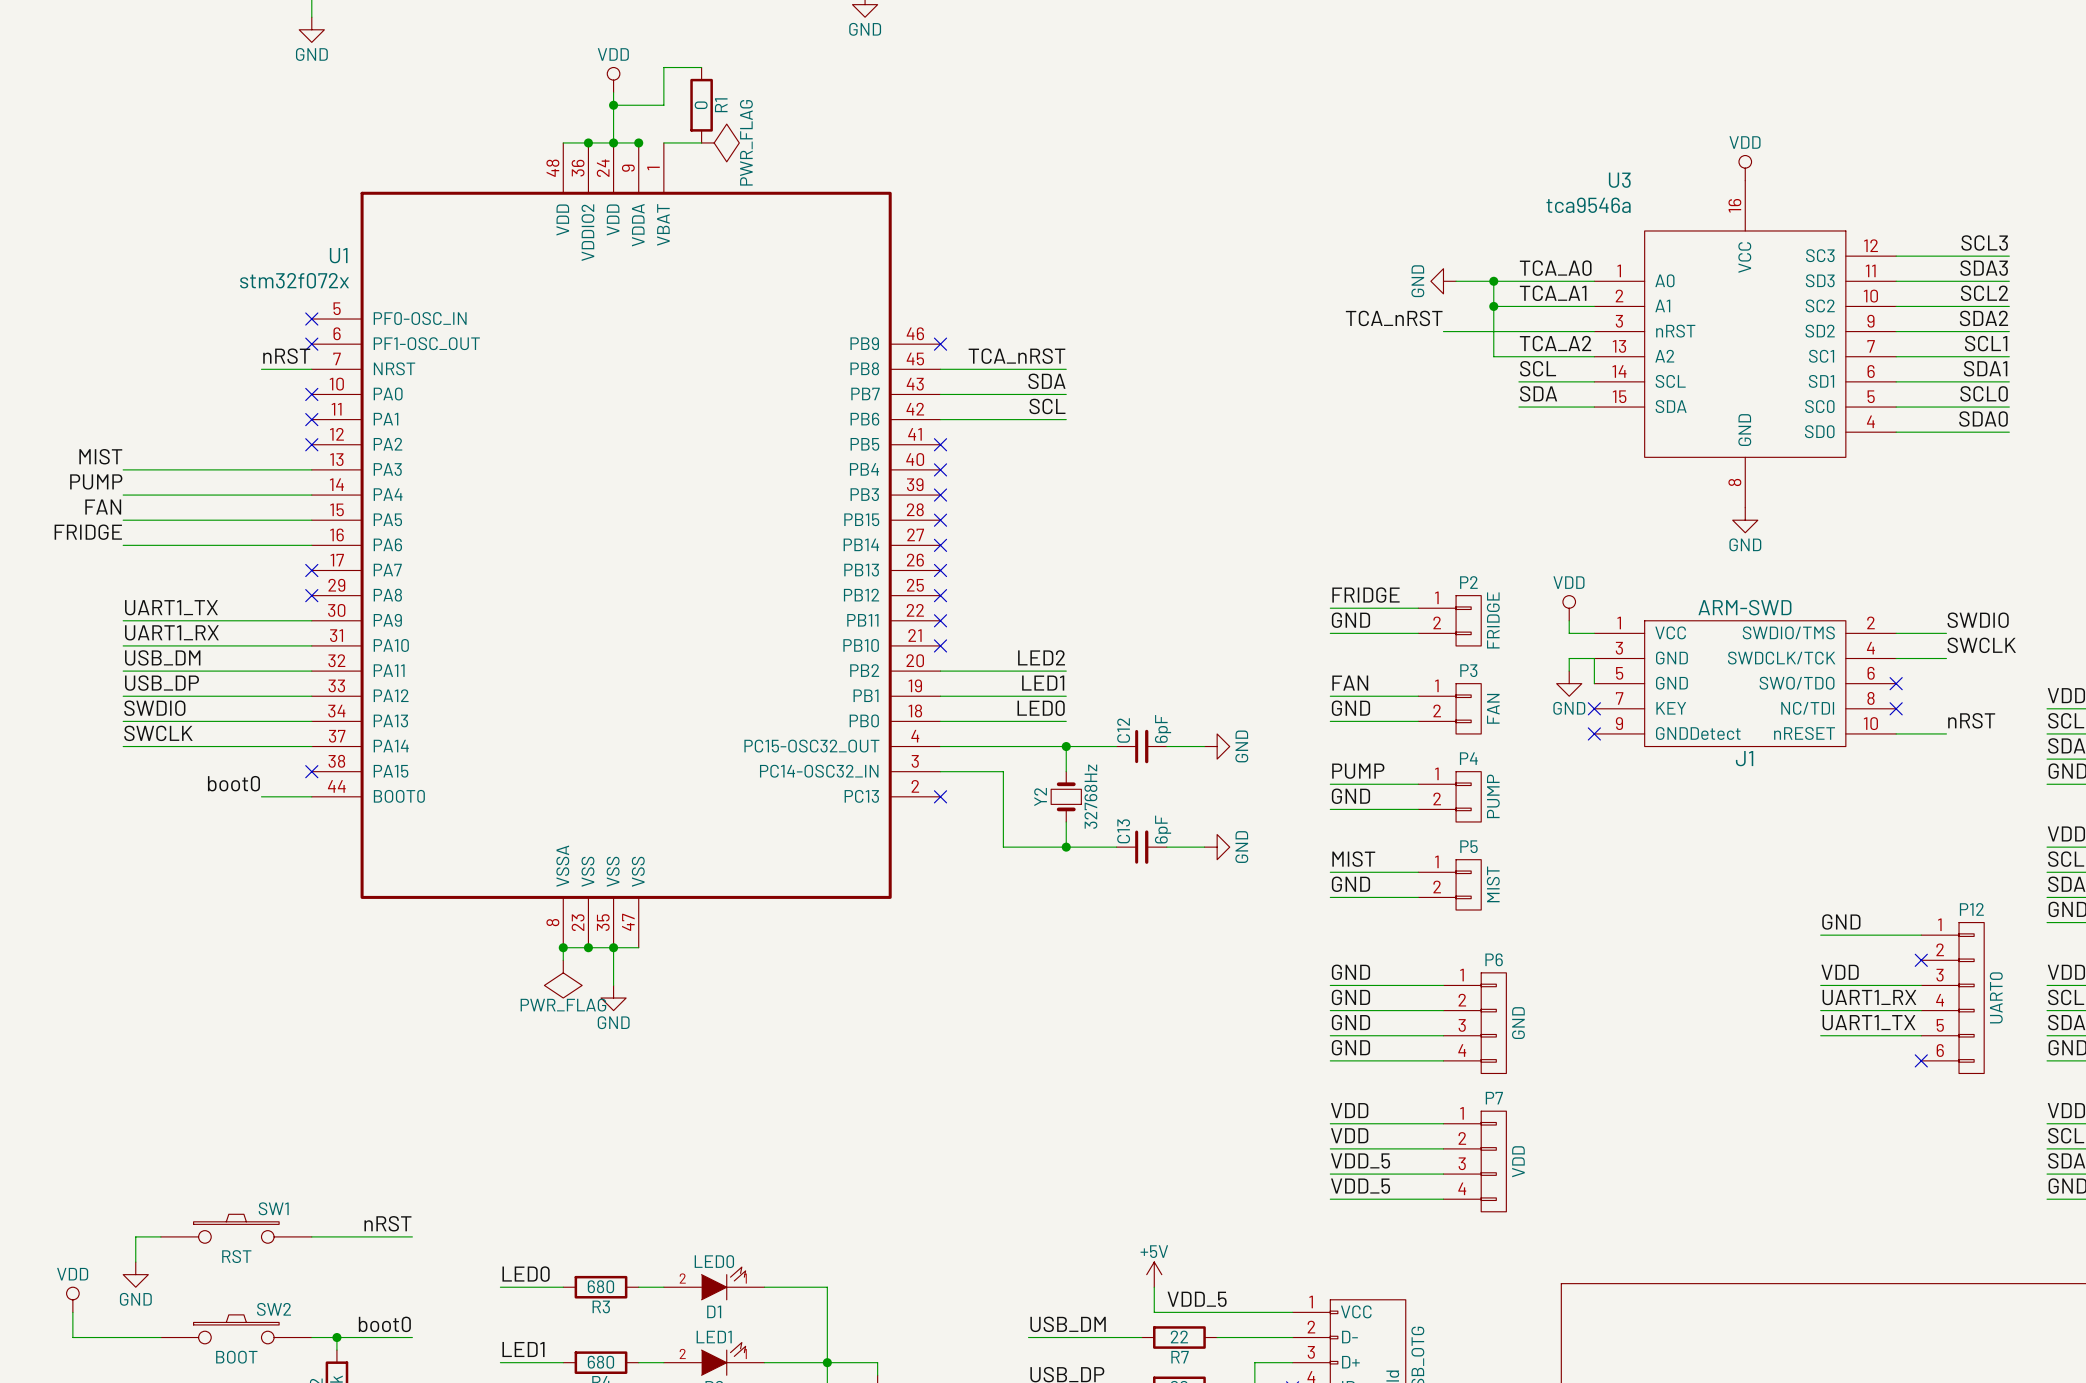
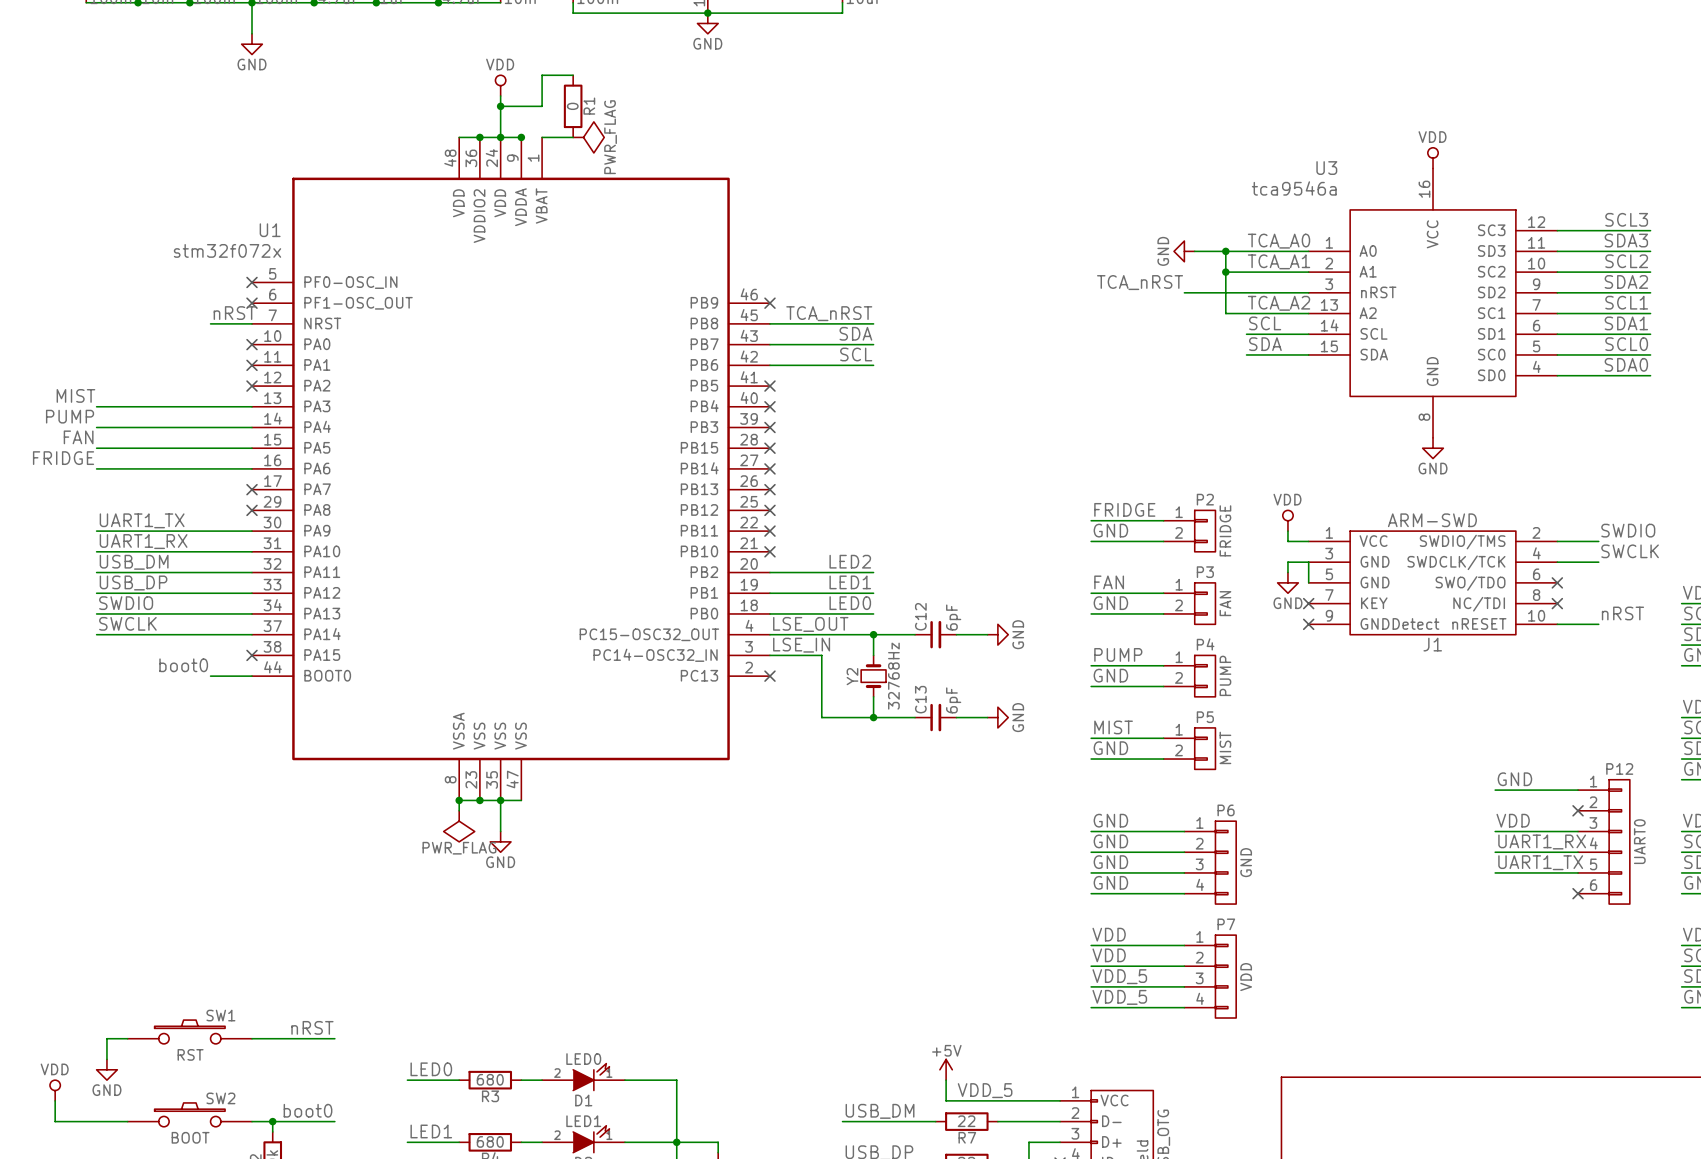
label: none -> LSE_OUT (810, 624)
label: none -> LSE_IN (801, 645)

